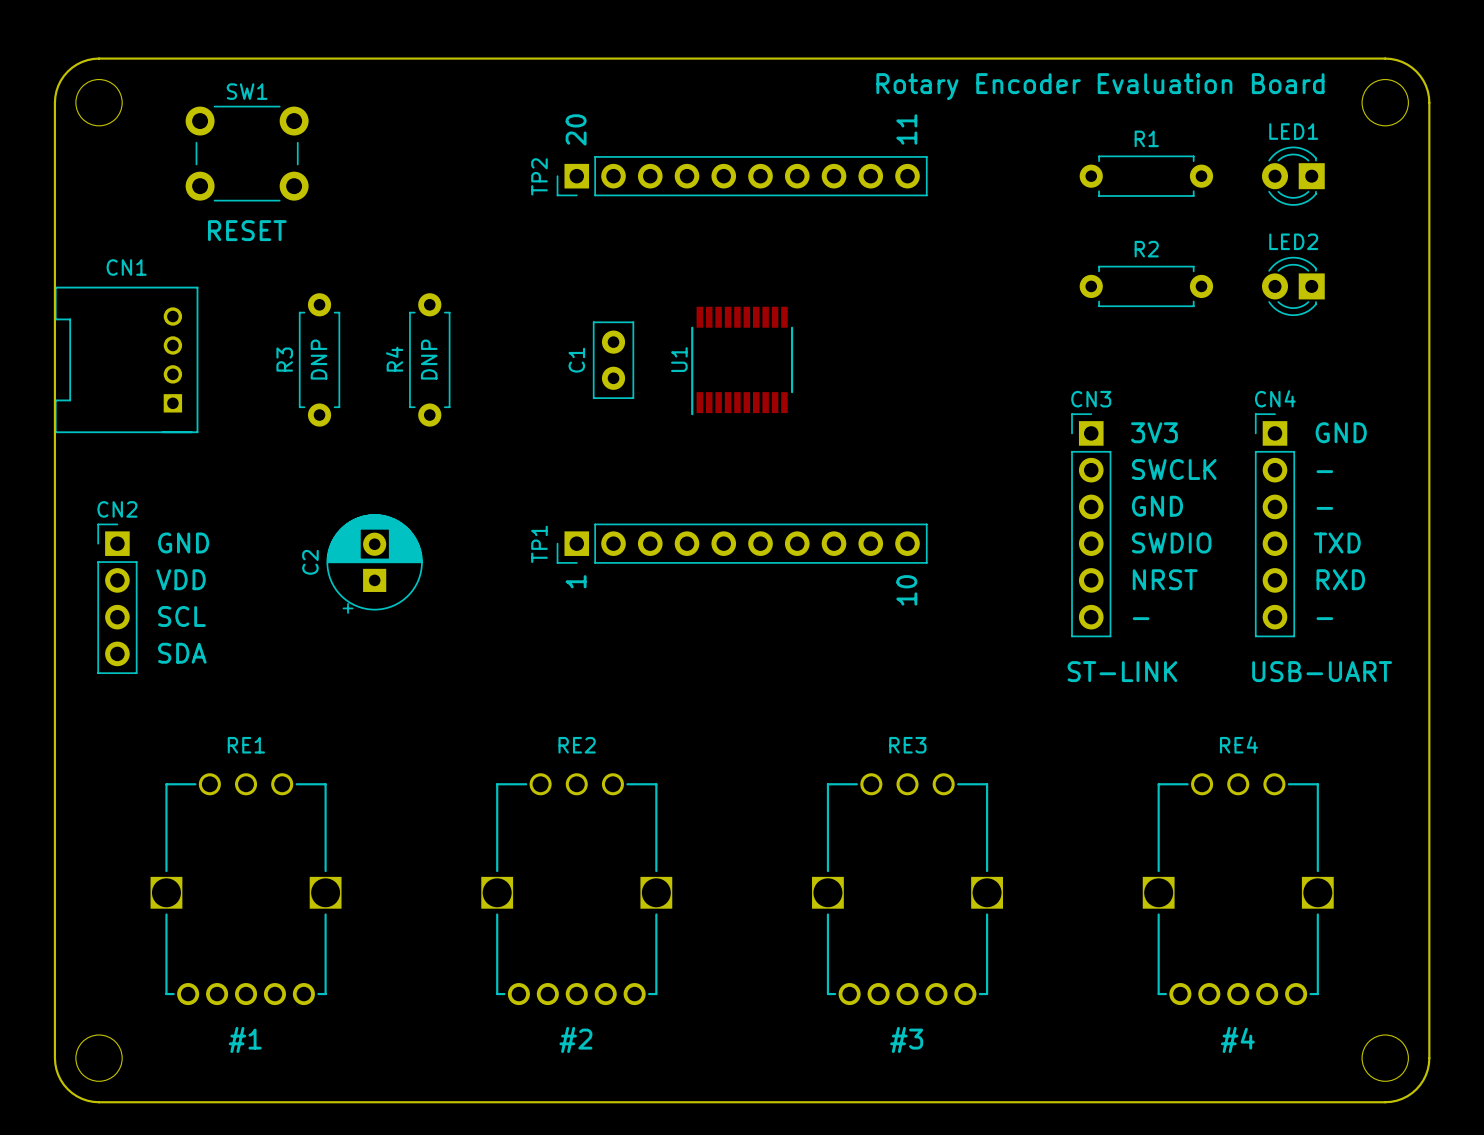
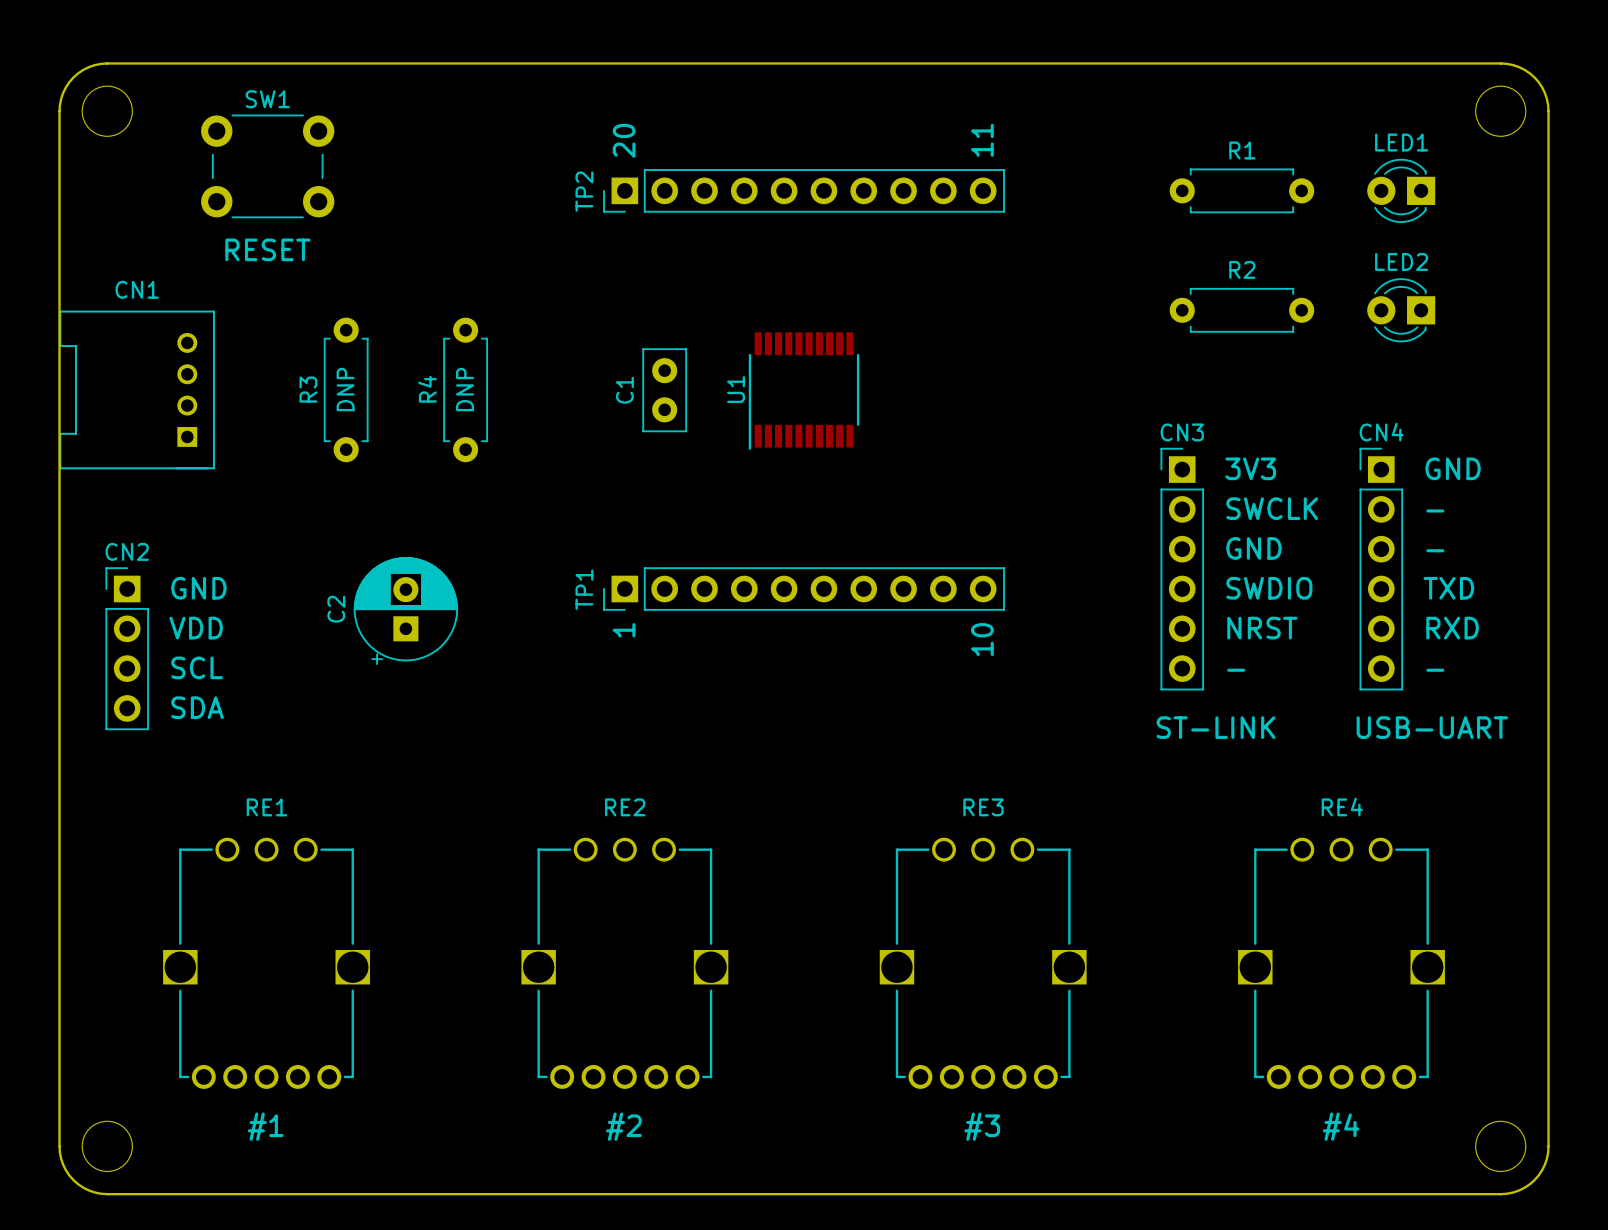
text: Rotary Encoder Evaluation Board (1100, 86) -> none

